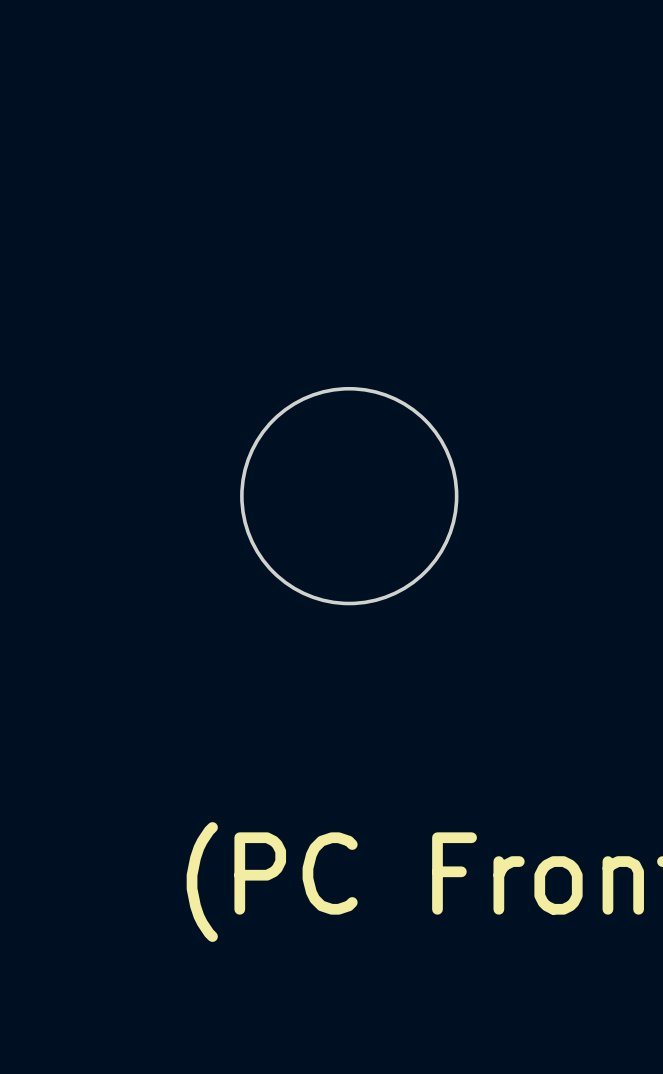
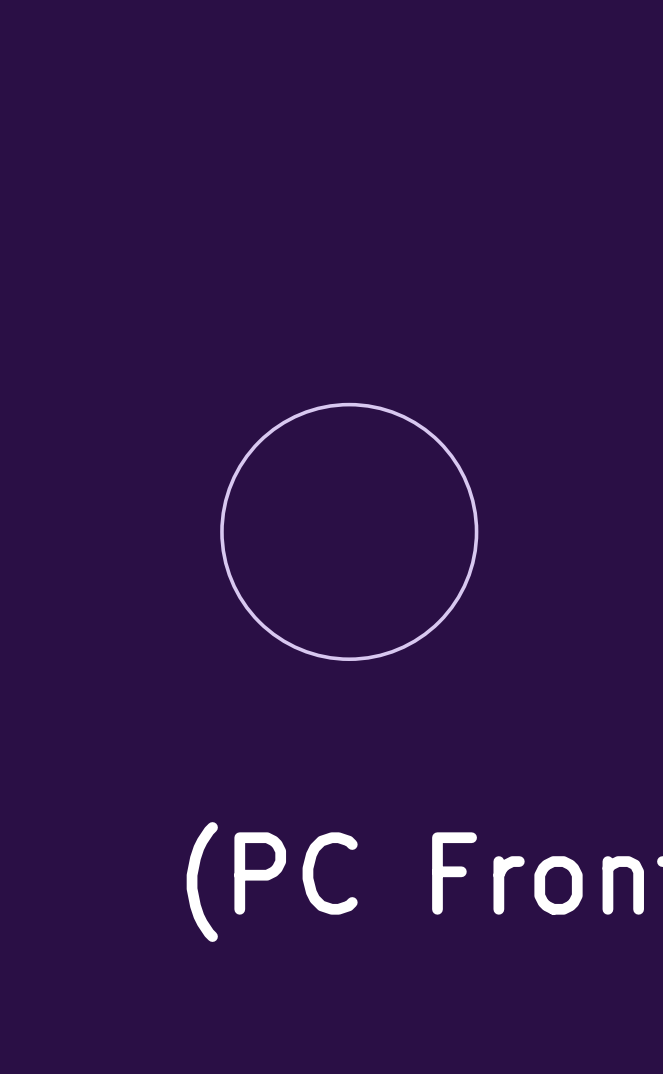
round board edge size: [240, 386, 459, 606] -> [220, 402, 479, 662]

